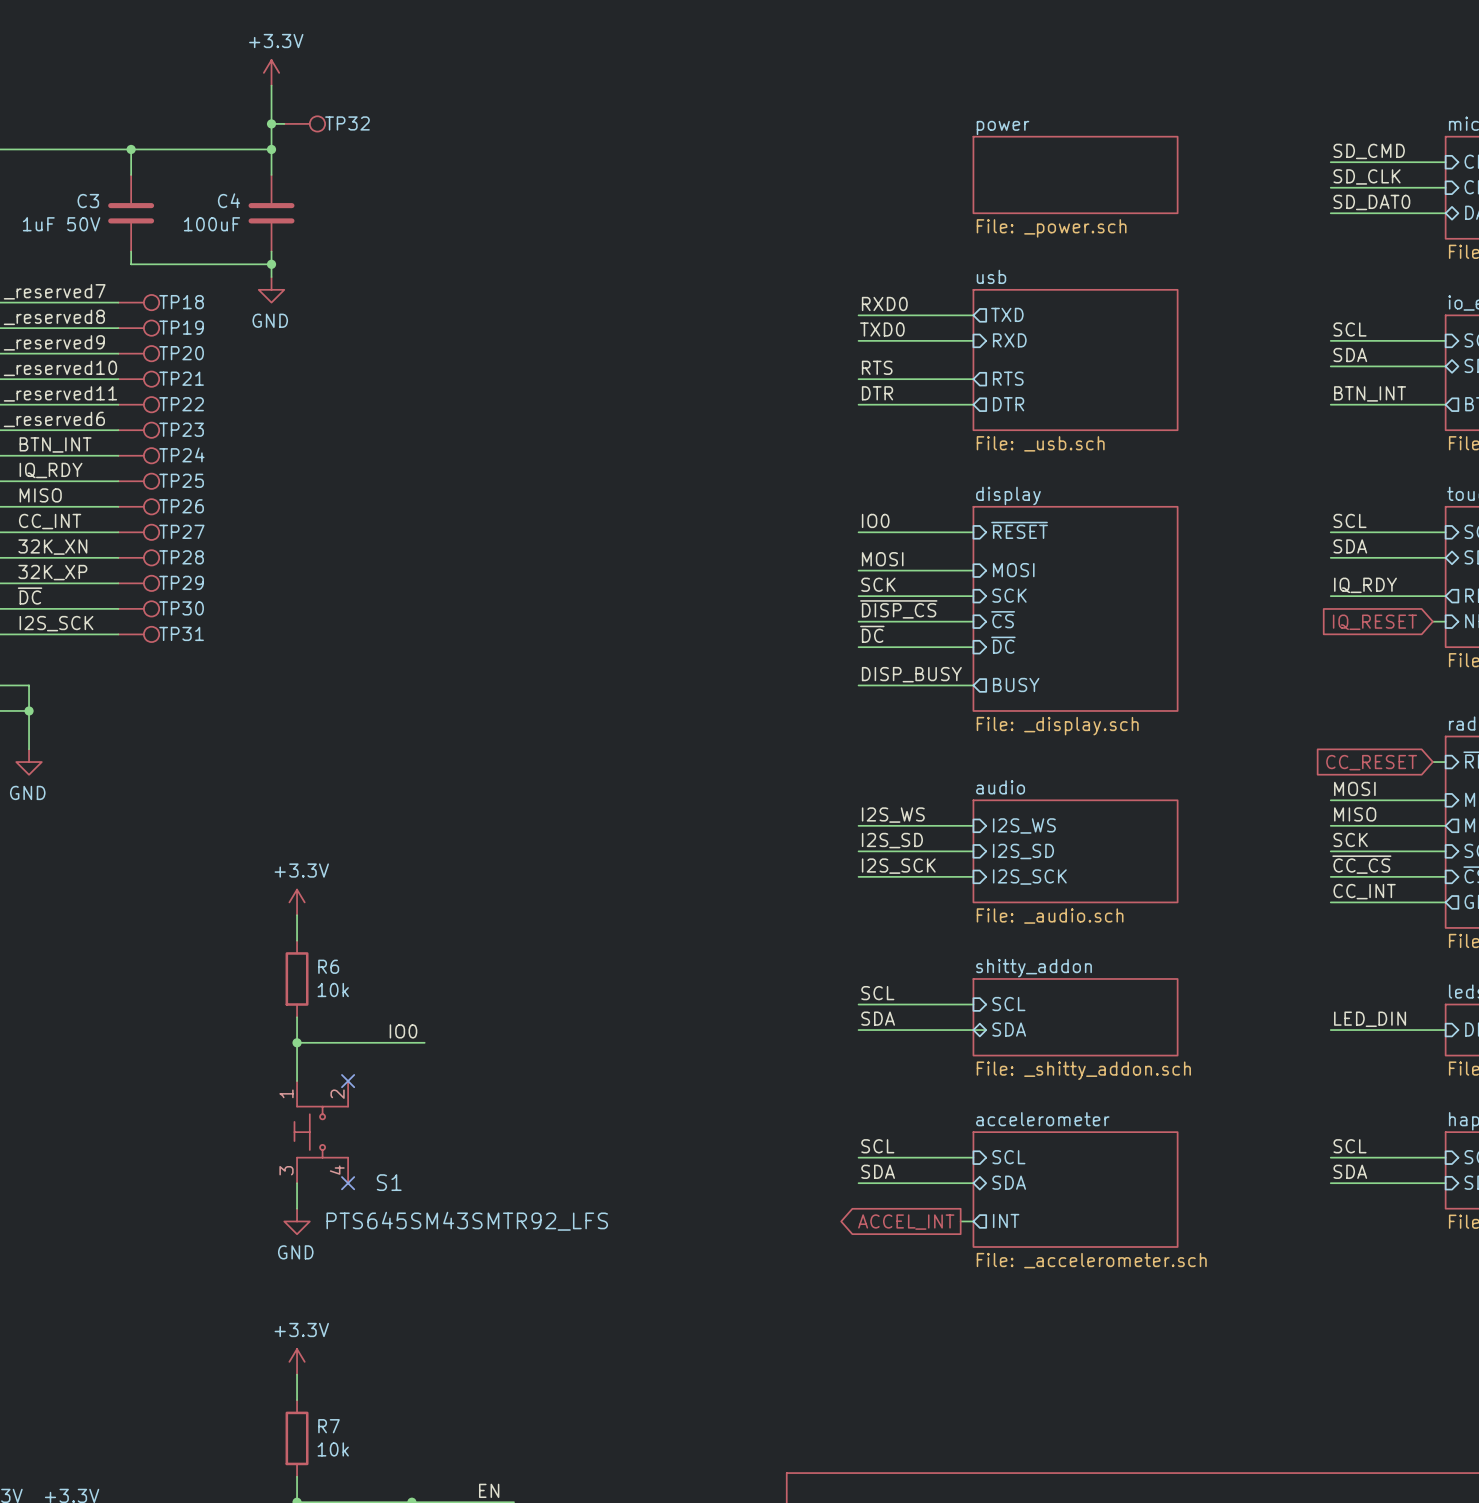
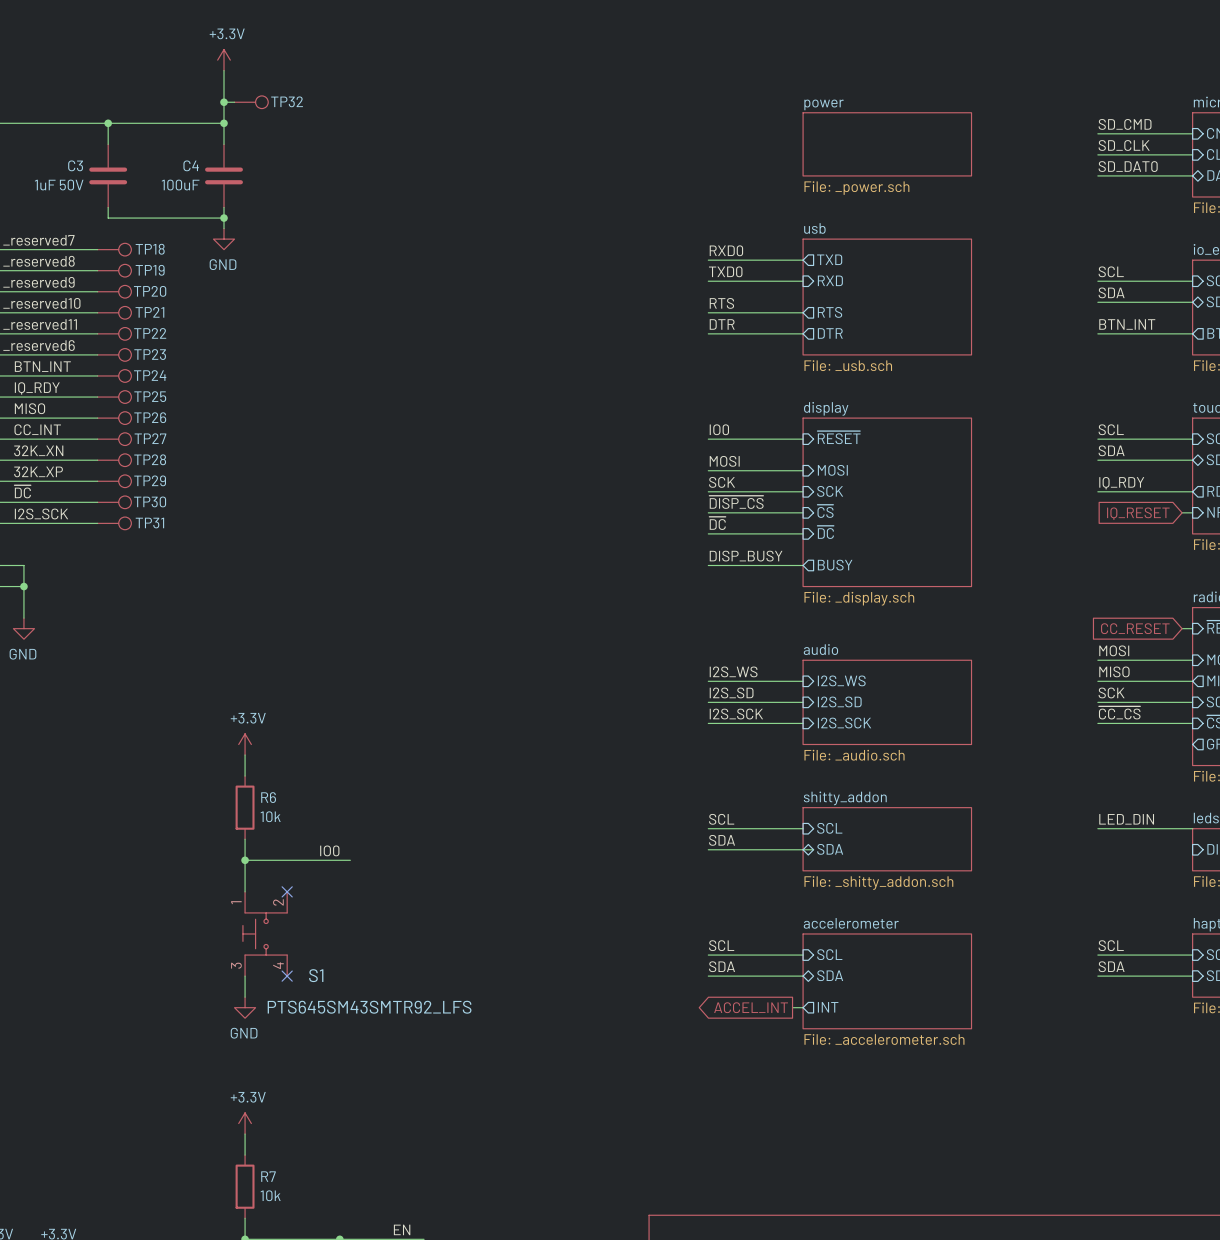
label: CC_INT (1364, 891) -> none
wire: (1330, 902) (1445, 902) -> none
label position: LED_DIN (1370, 1019) -> LED_DIN (1126, 819)
wire: (1330, 1030) (1445, 1030) -> (1097, 828) (1192, 828)

